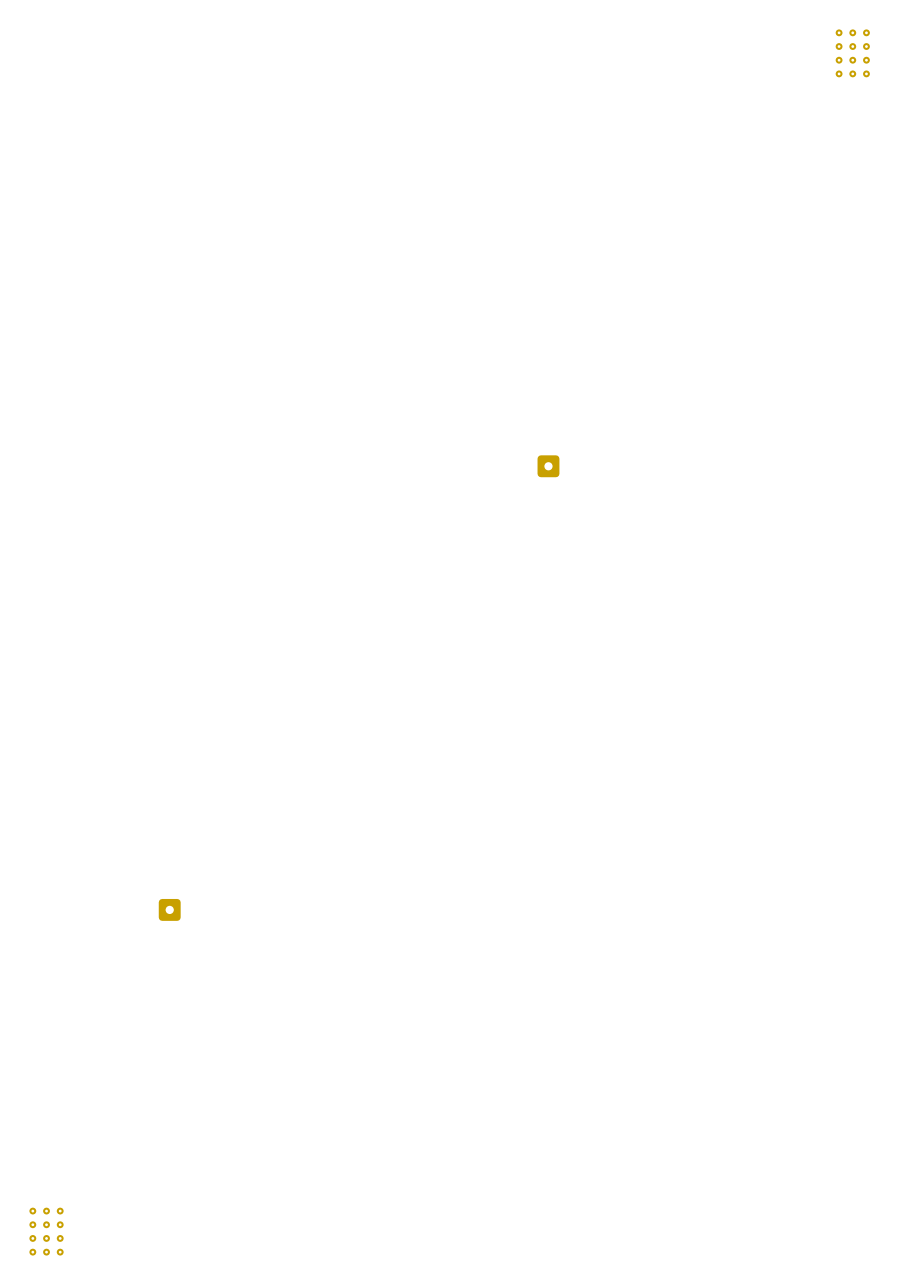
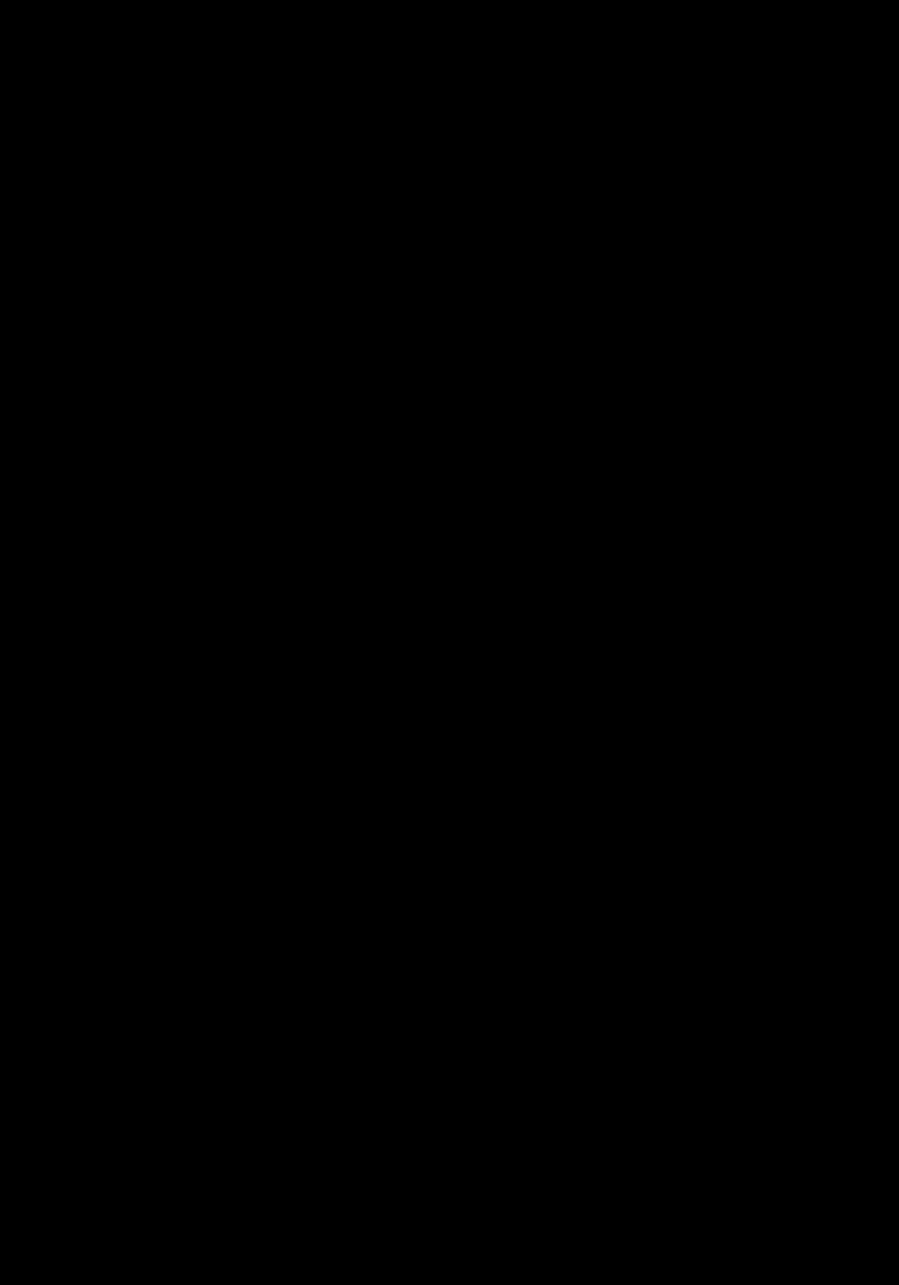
part: (852, 53) -> none
part: (548, 466) -> none
part: (169, 909) -> none
part: (46, 1231) -> none

